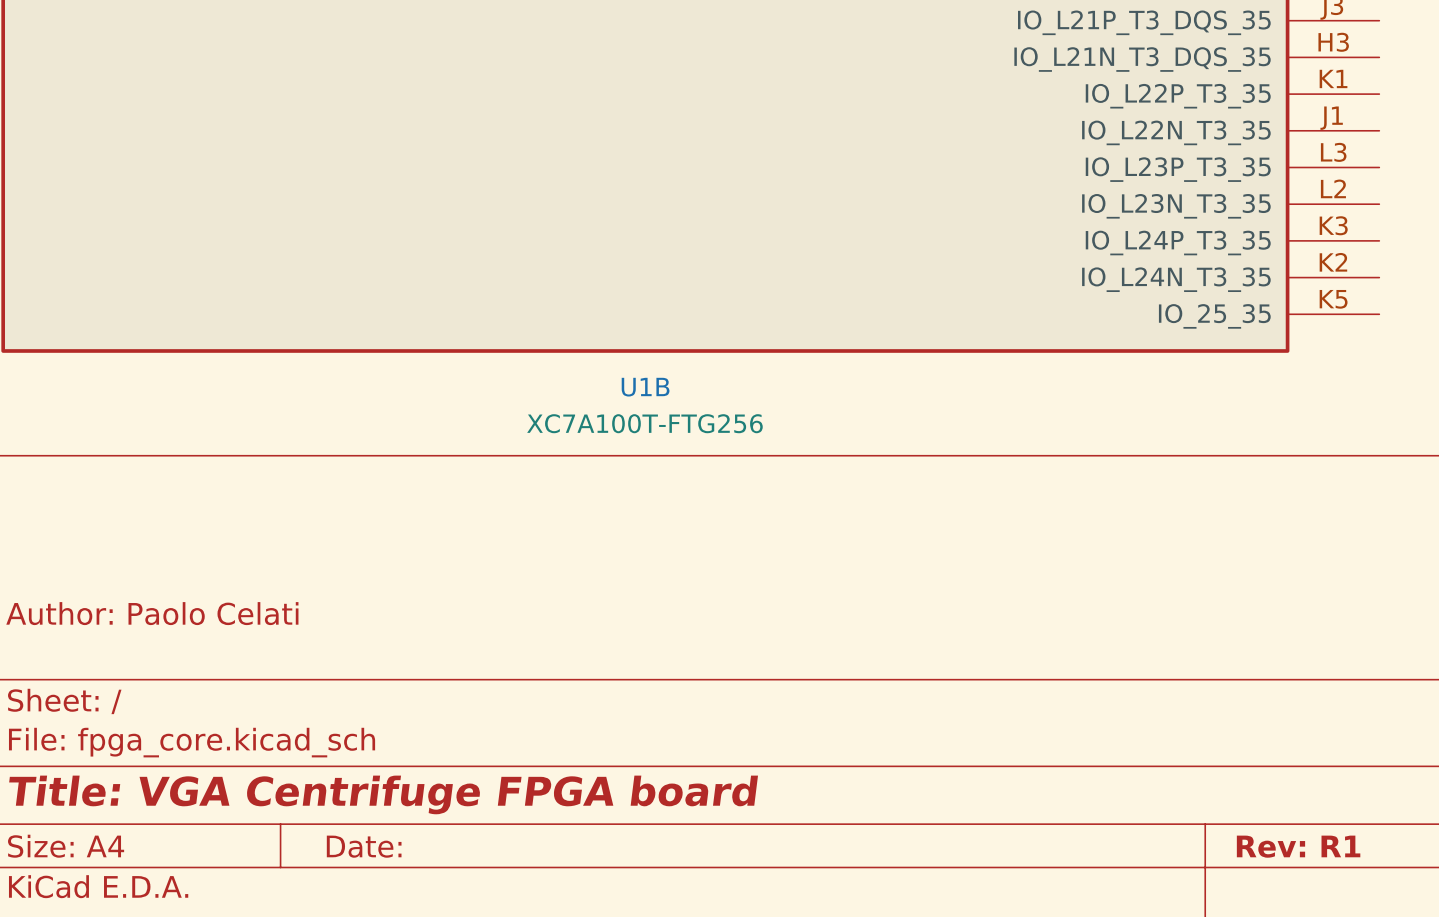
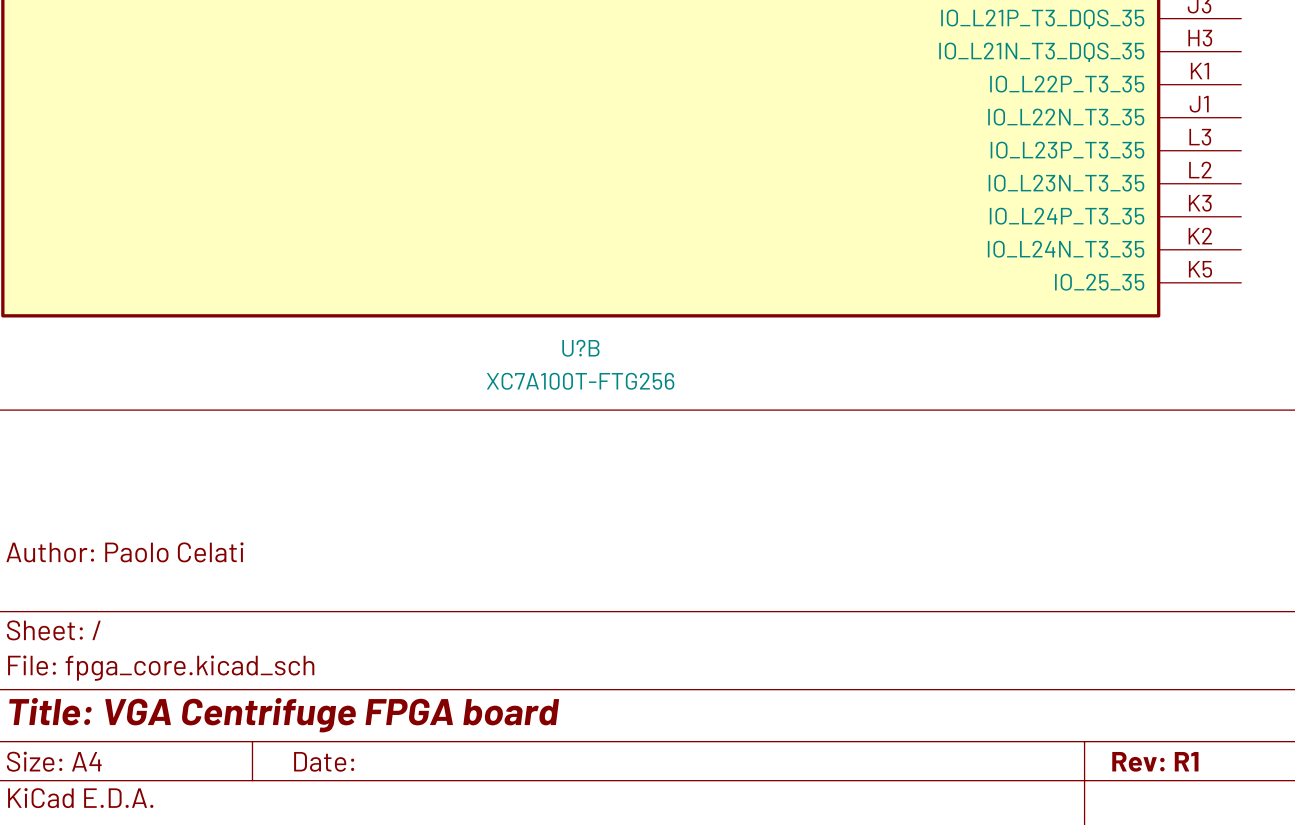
U1B name: U1B (645, 387) -> U?B (580, 348)

